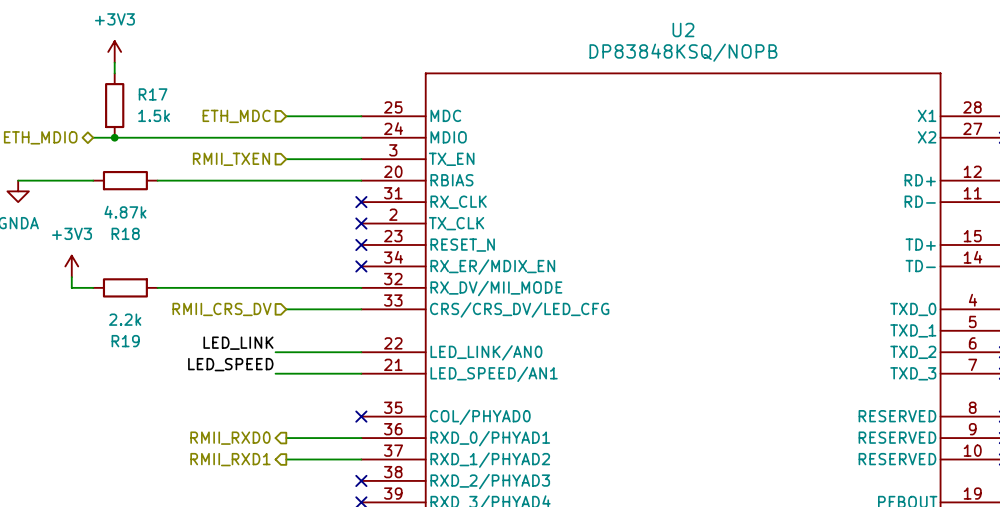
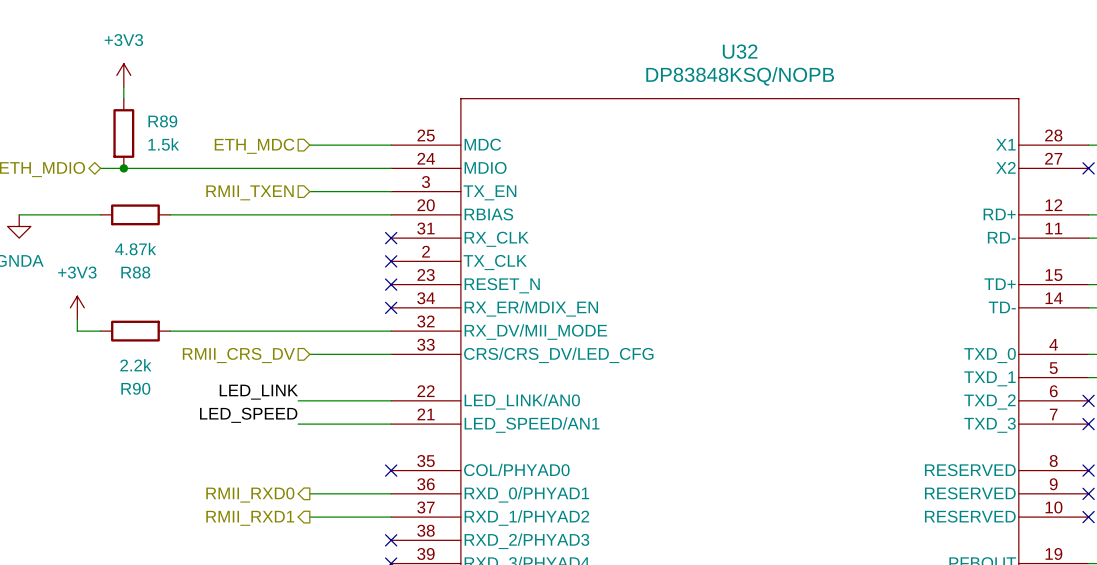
U2 name: U2 (683, 30) -> U32 (740, 51)
R17 name: R17 (153, 94) -> R89 (162, 121)
R18 name: R18 (125, 233) -> R88 (135, 272)
R19 name: R19 (125, 341) -> R90 (135, 388)

